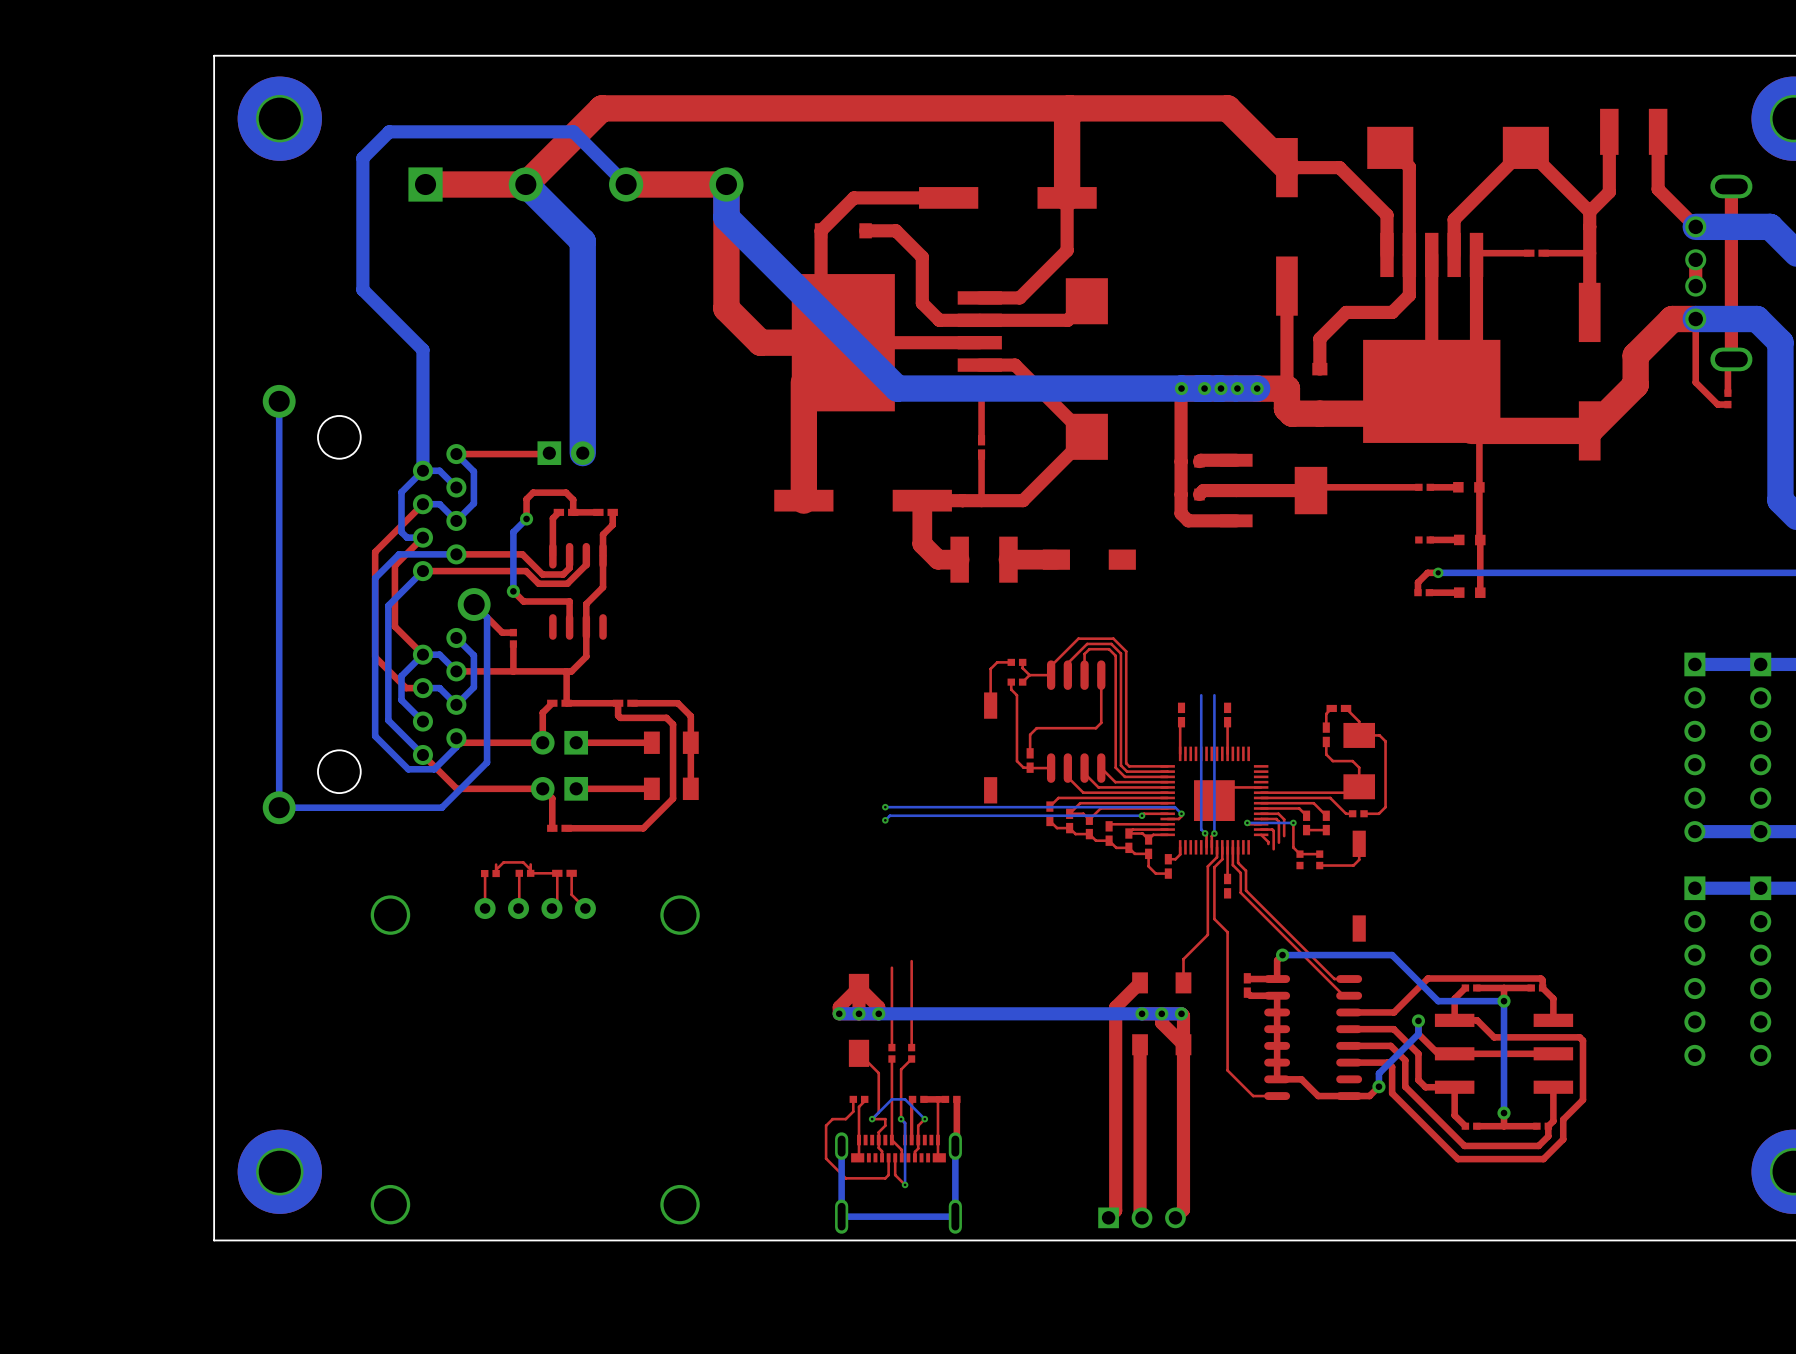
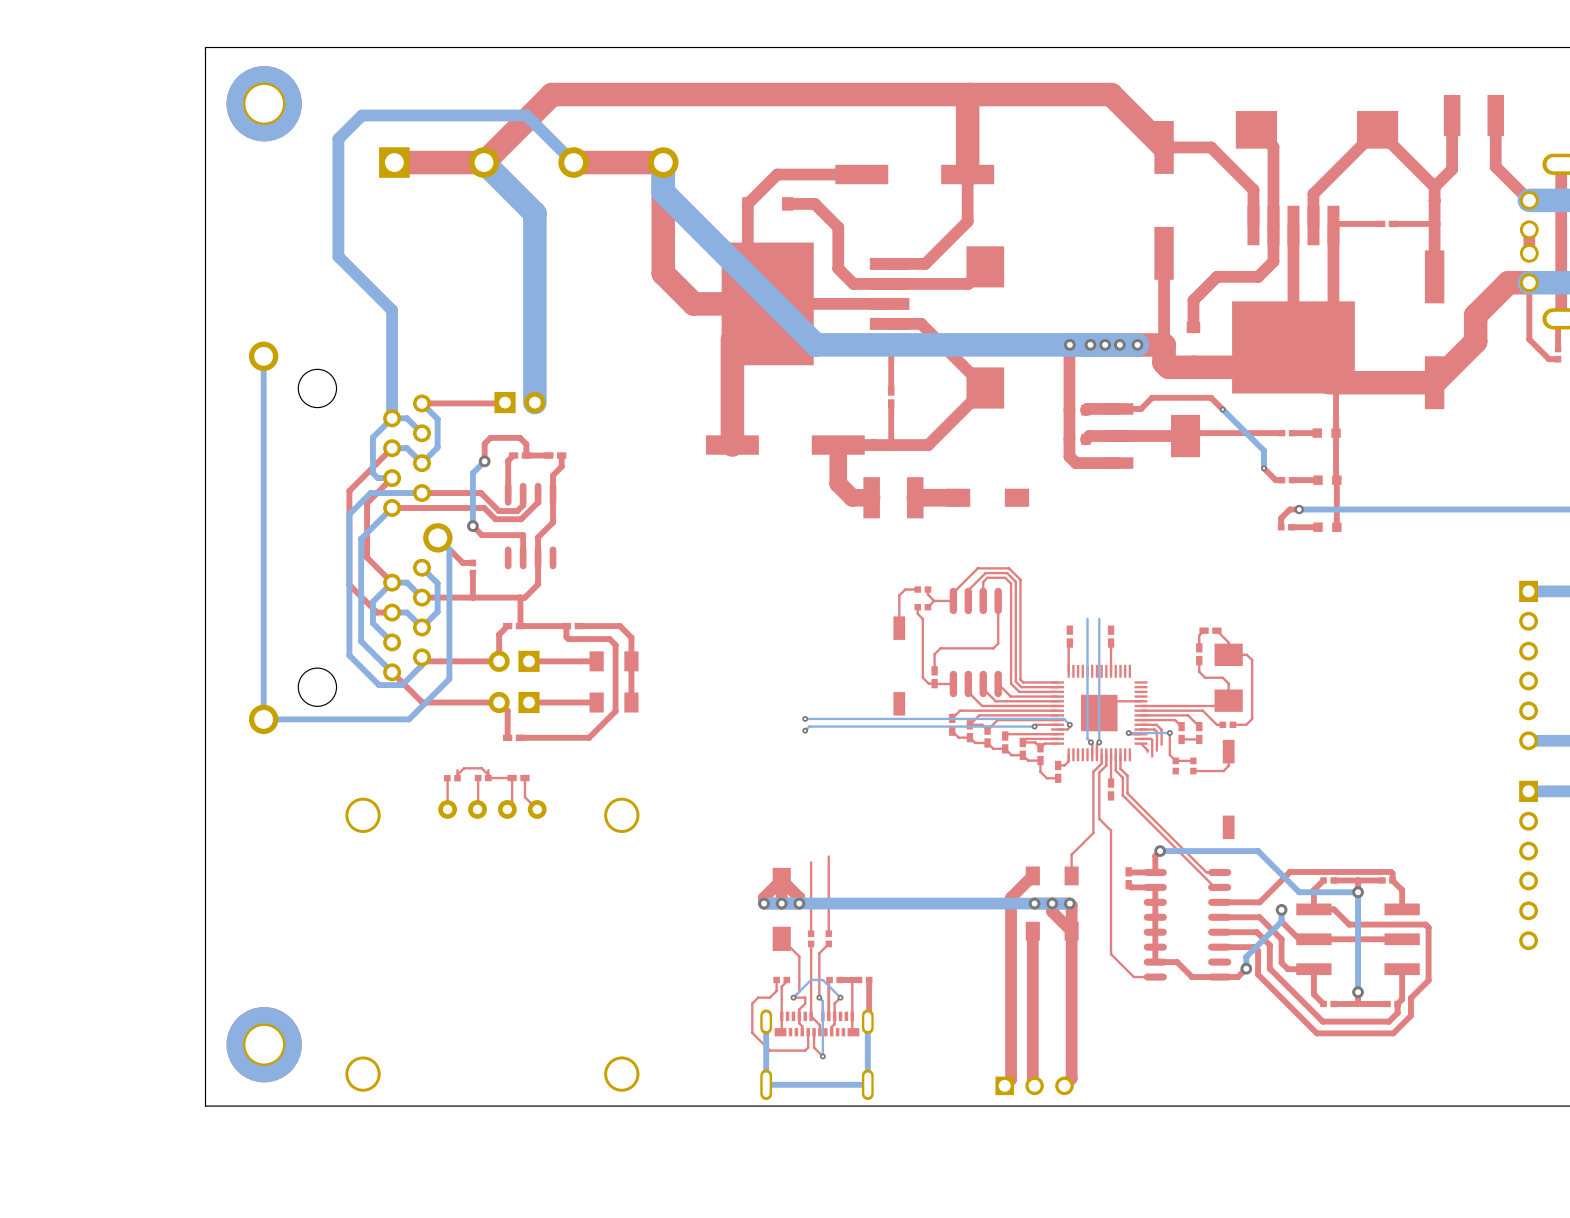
top track: none -> (1118, 408) (1141, 408) (1152, 397) (1211, 397) (1222, 409)
bottom track: none -> (1222, 409) (1263, 450) (1263, 468)
via: none -> (1222, 409)
top track: none -> (1263, 468) (1275, 480) (1281, 480)
via: none -> (1263, 468)

